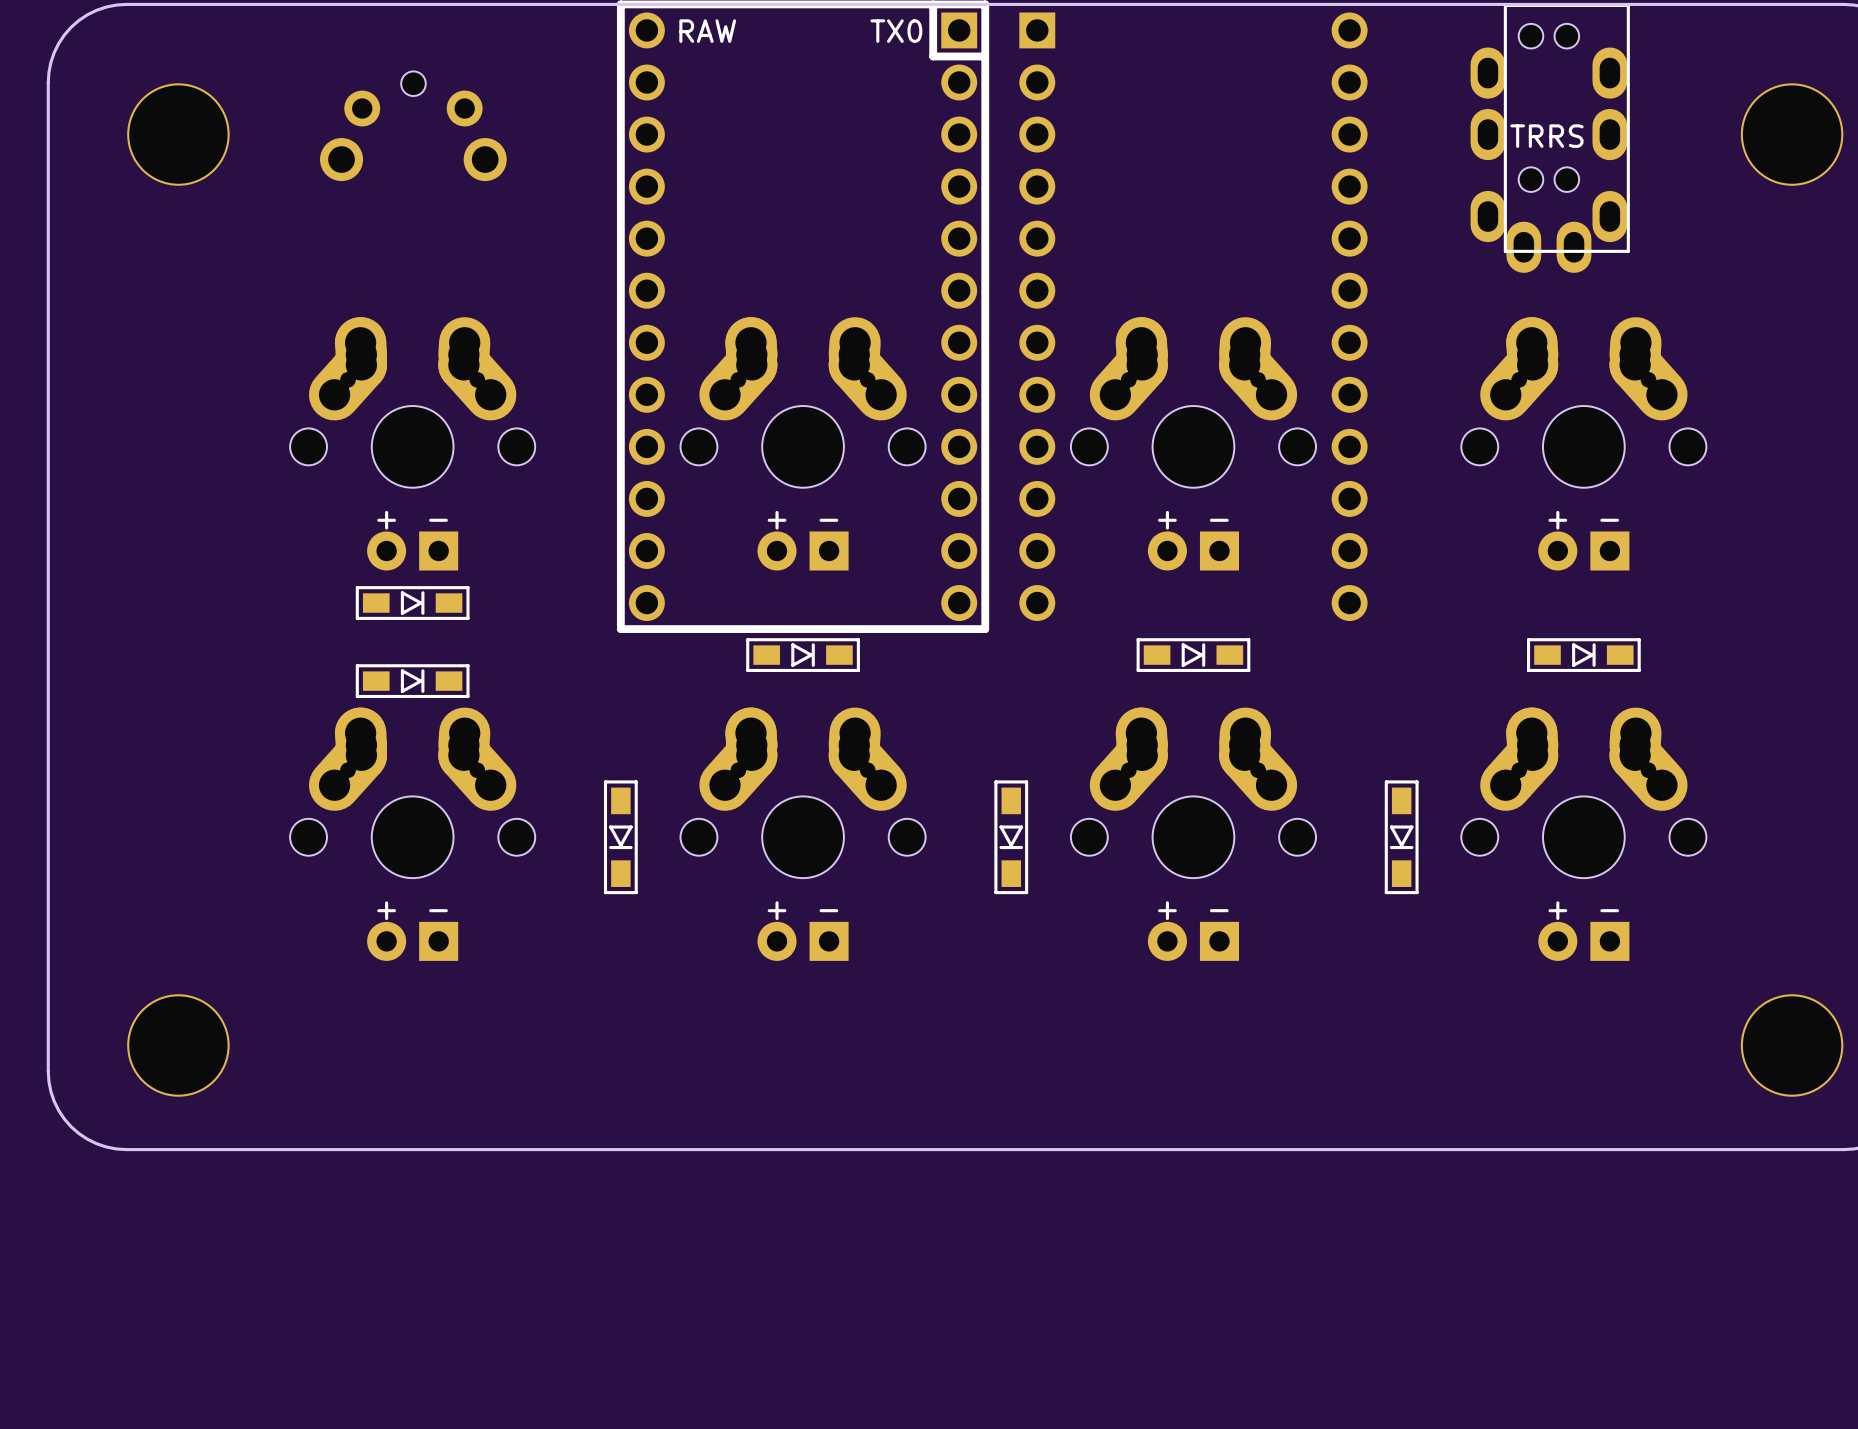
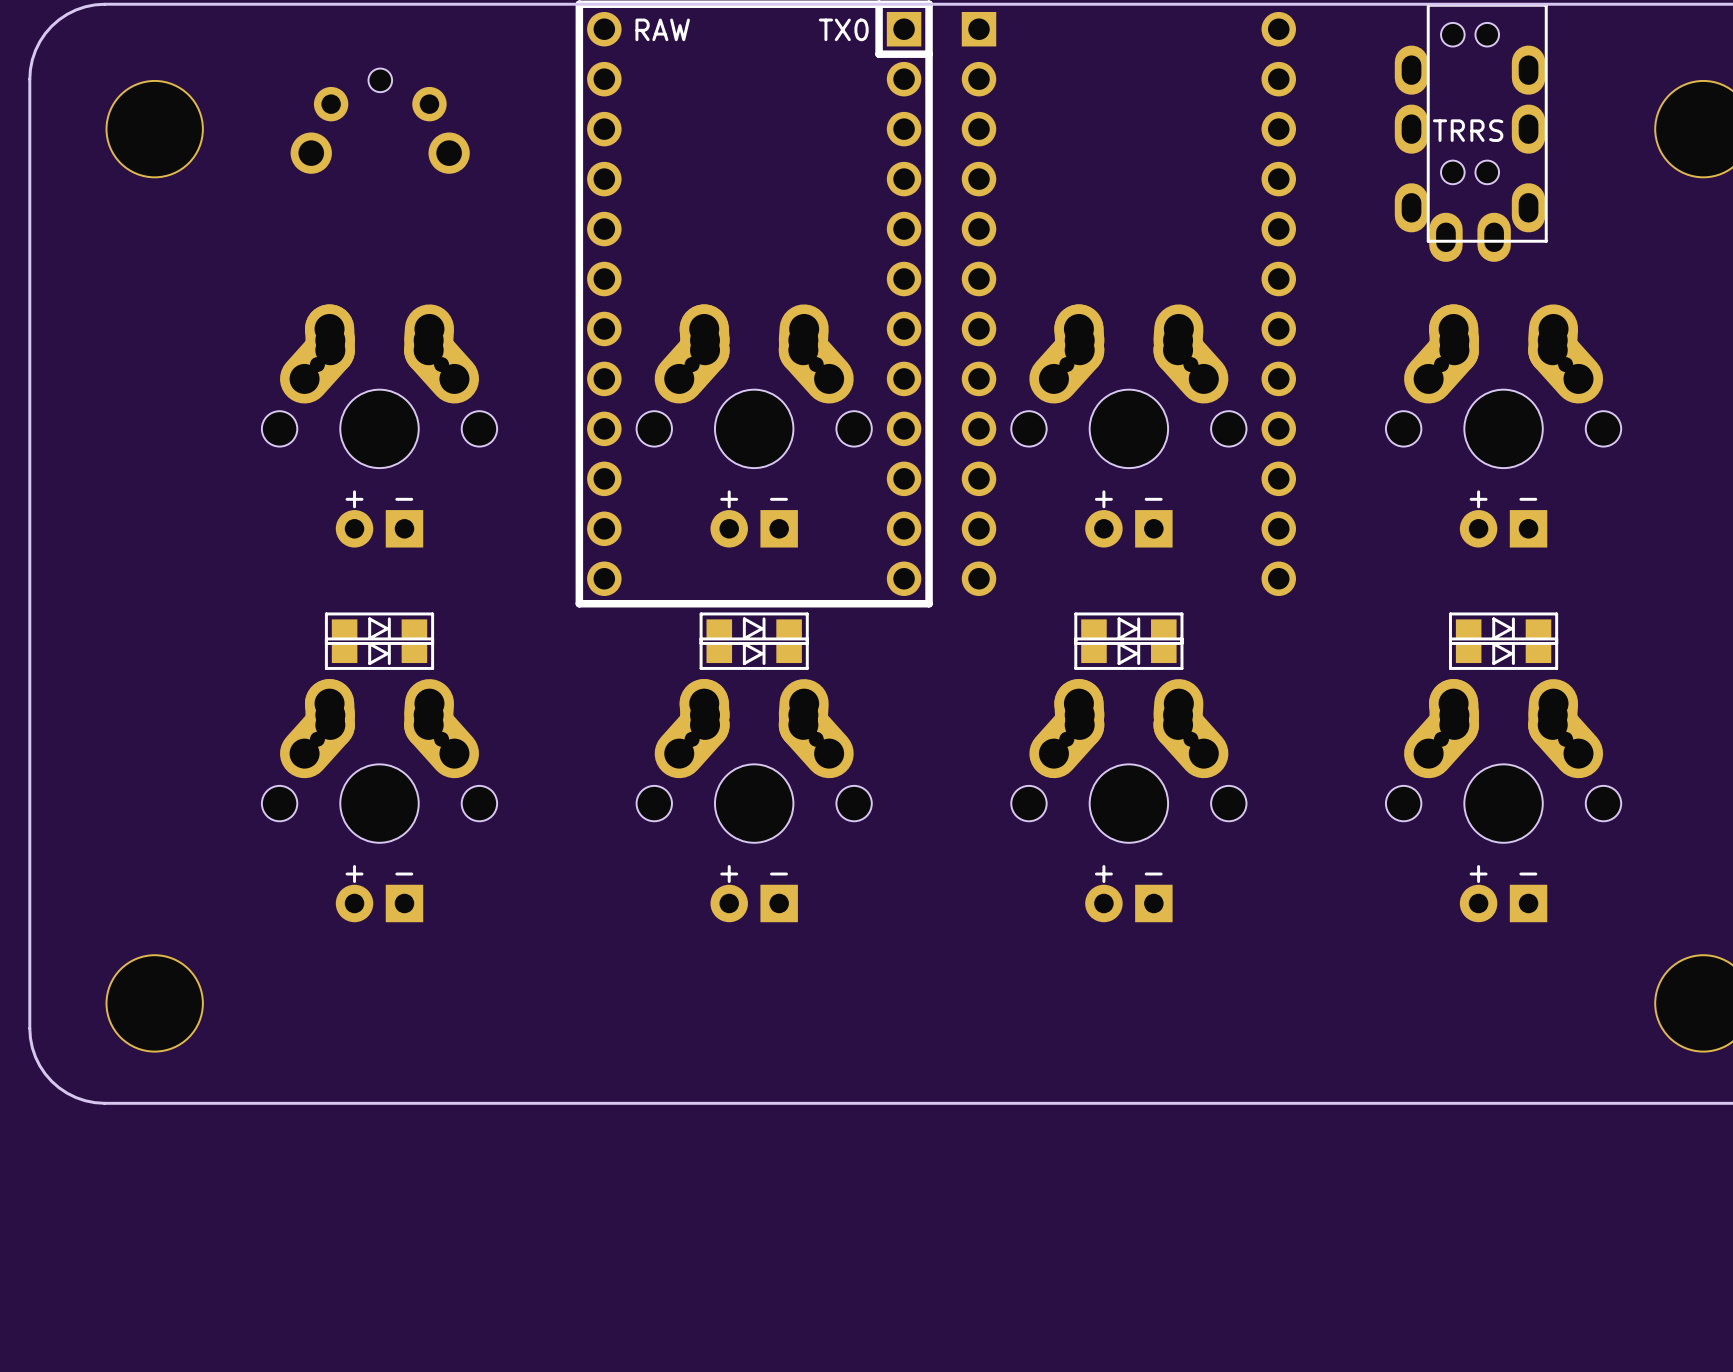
part position: (412, 603) -> (379, 628)
part: none -> (754, 653)
part: none -> (1128, 653)
part: none -> (1503, 653)
part: (620, 837) -> none
part: (1011, 837) -> none
part: (1401, 837) -> none

